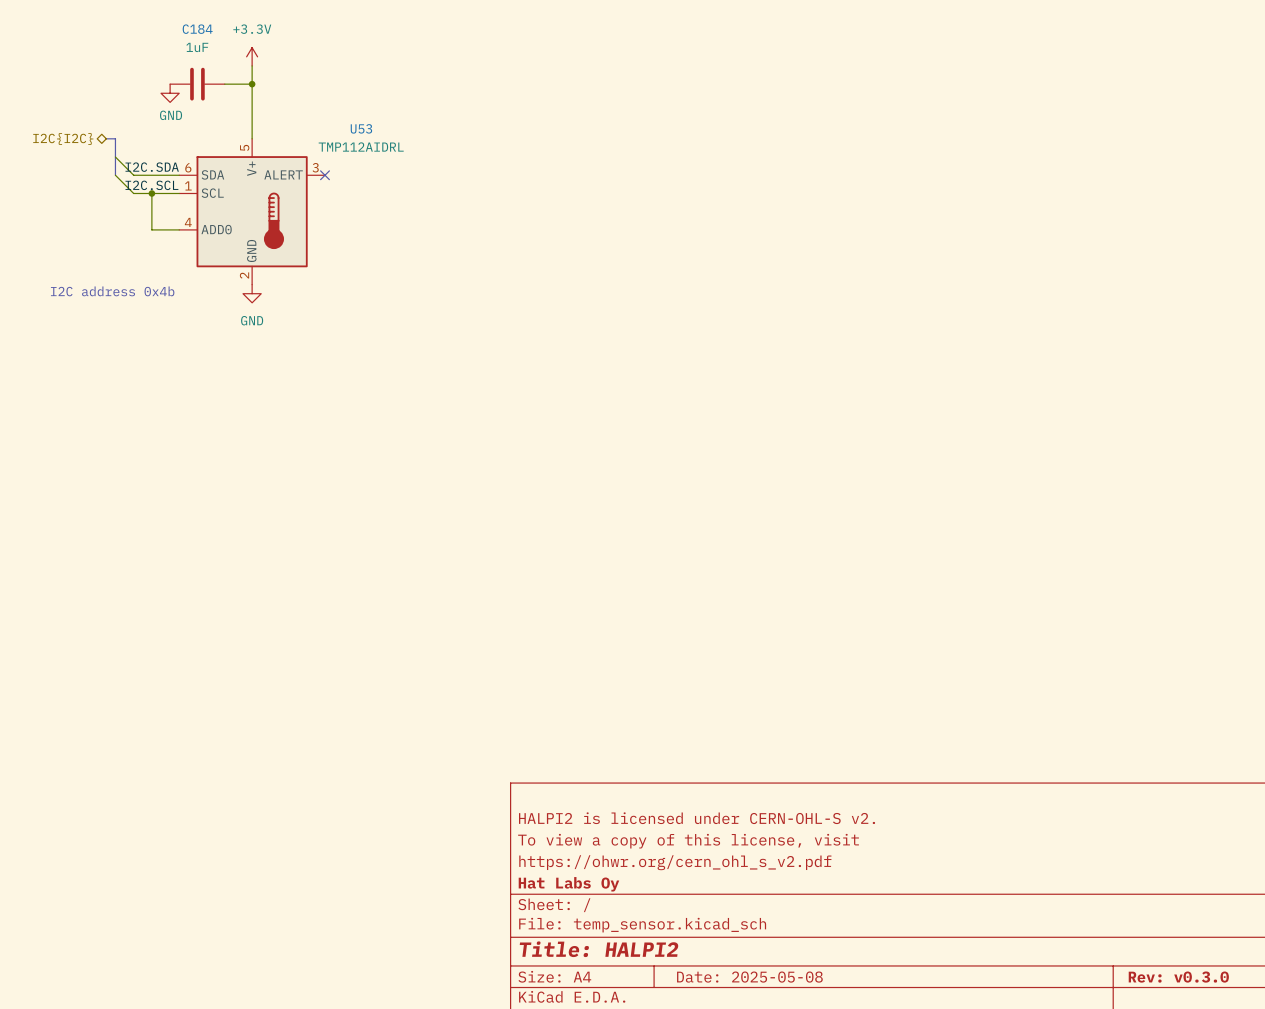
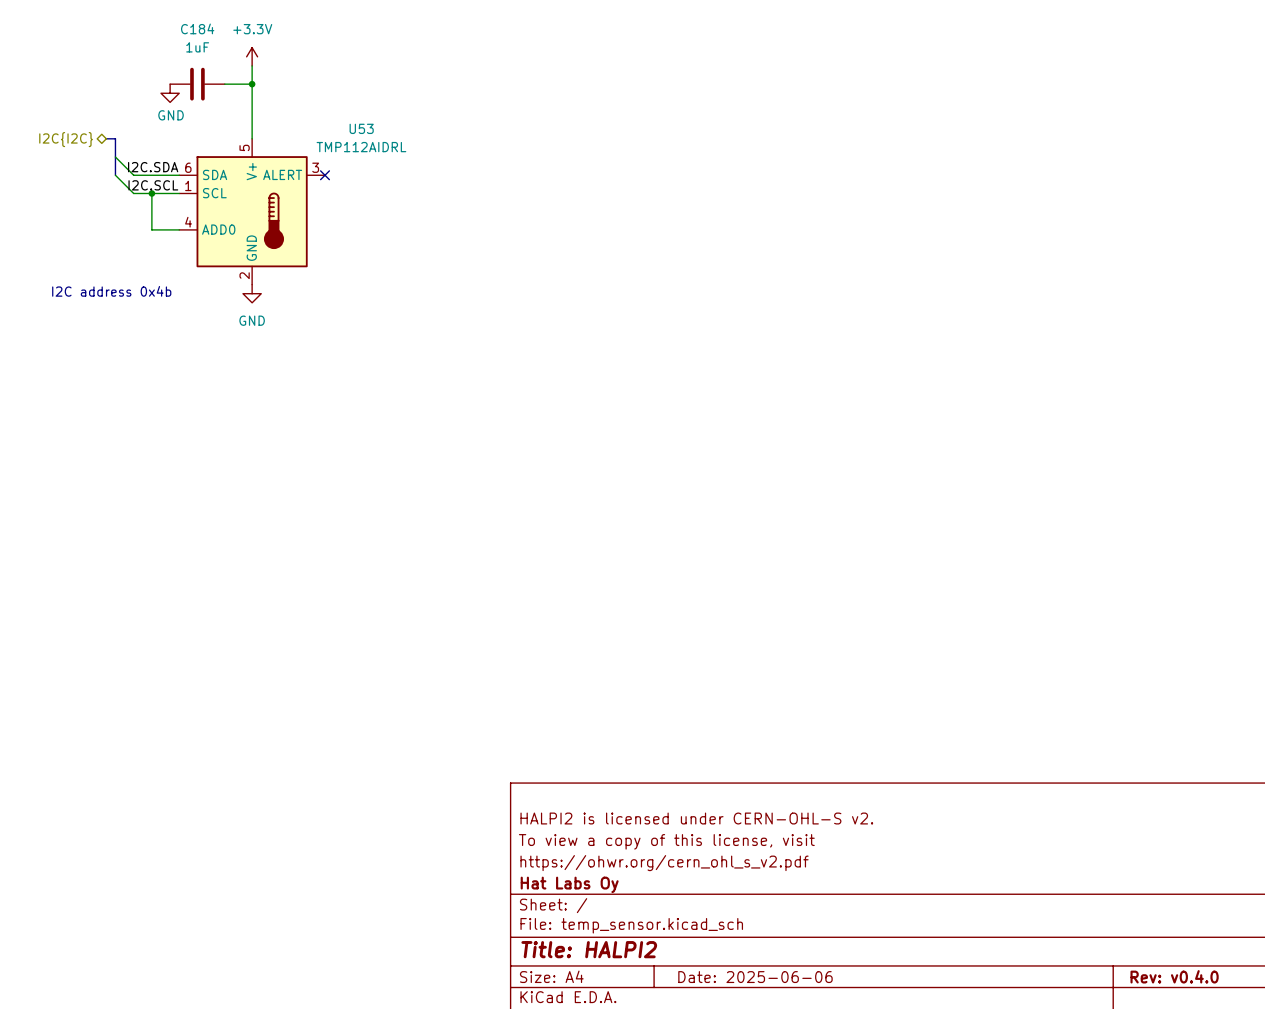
title block: Date: 2025-05-08 (749, 977) -> Date: 2025-06-06 (755, 977)
title block: Rev: v0.3.0 (1178, 977) -> Rev: v0.4.0 (1174, 976)

